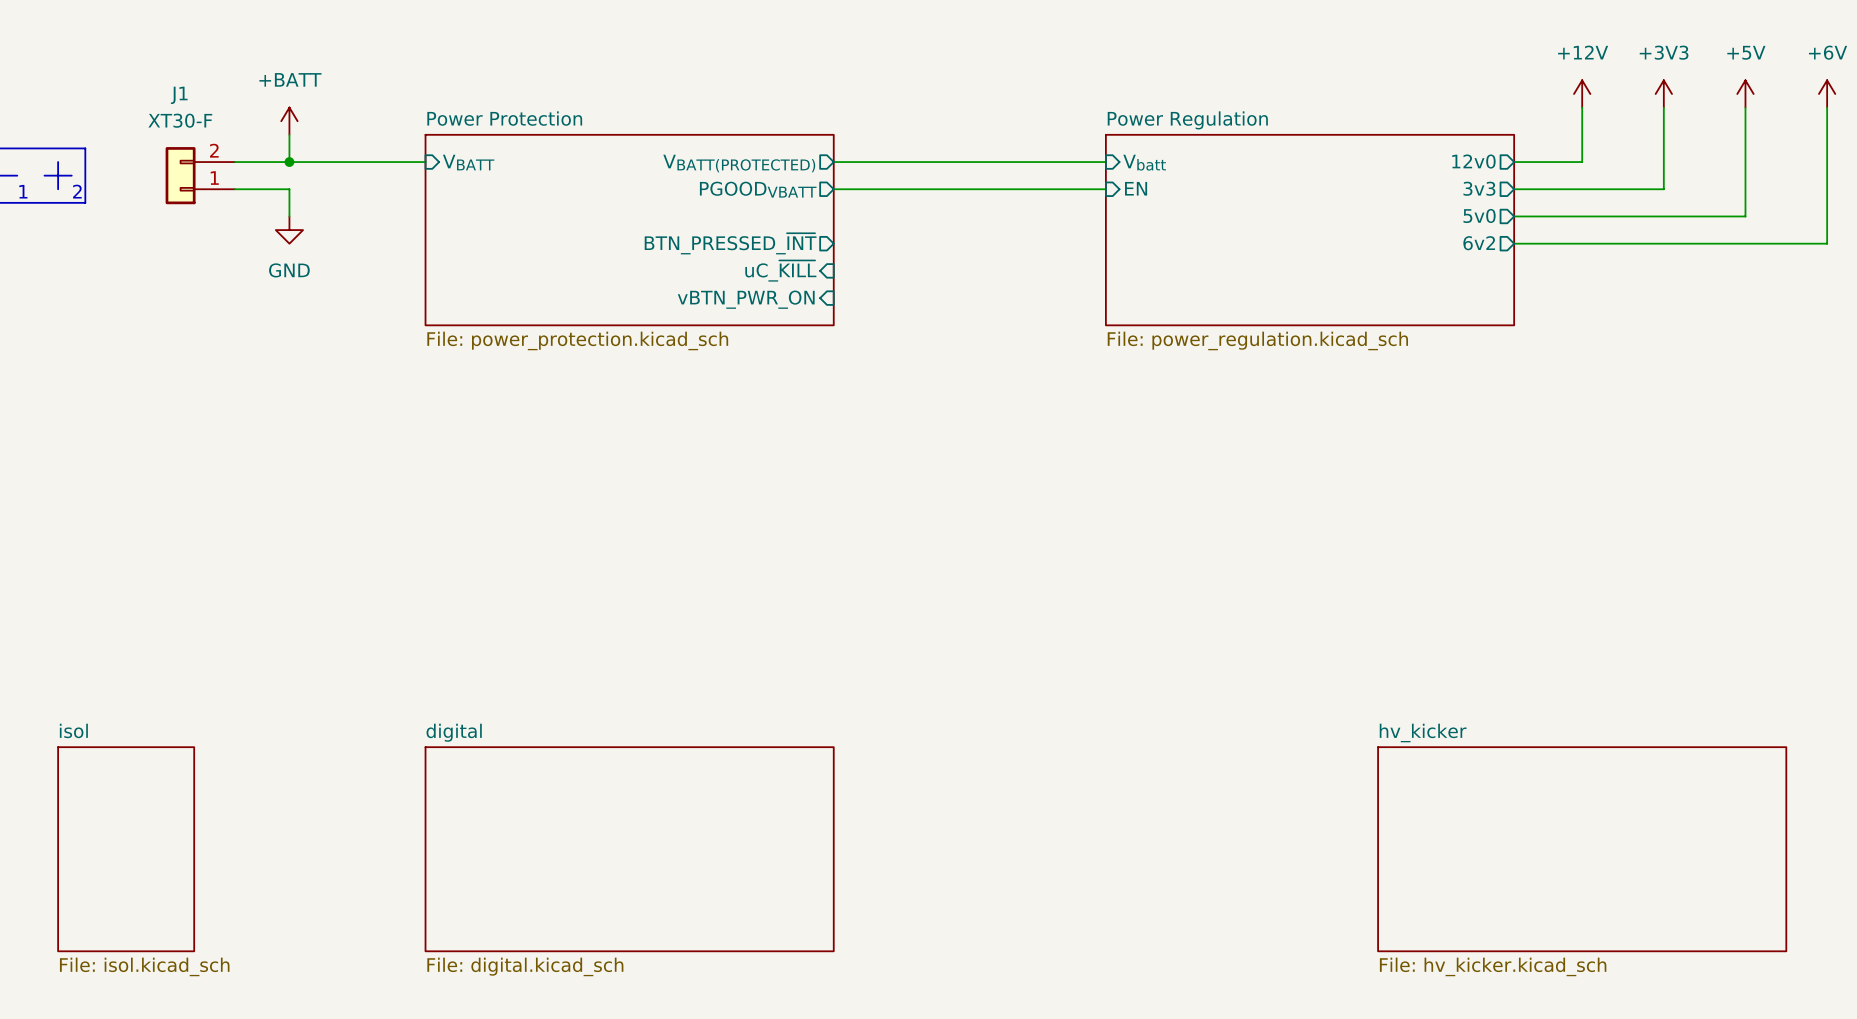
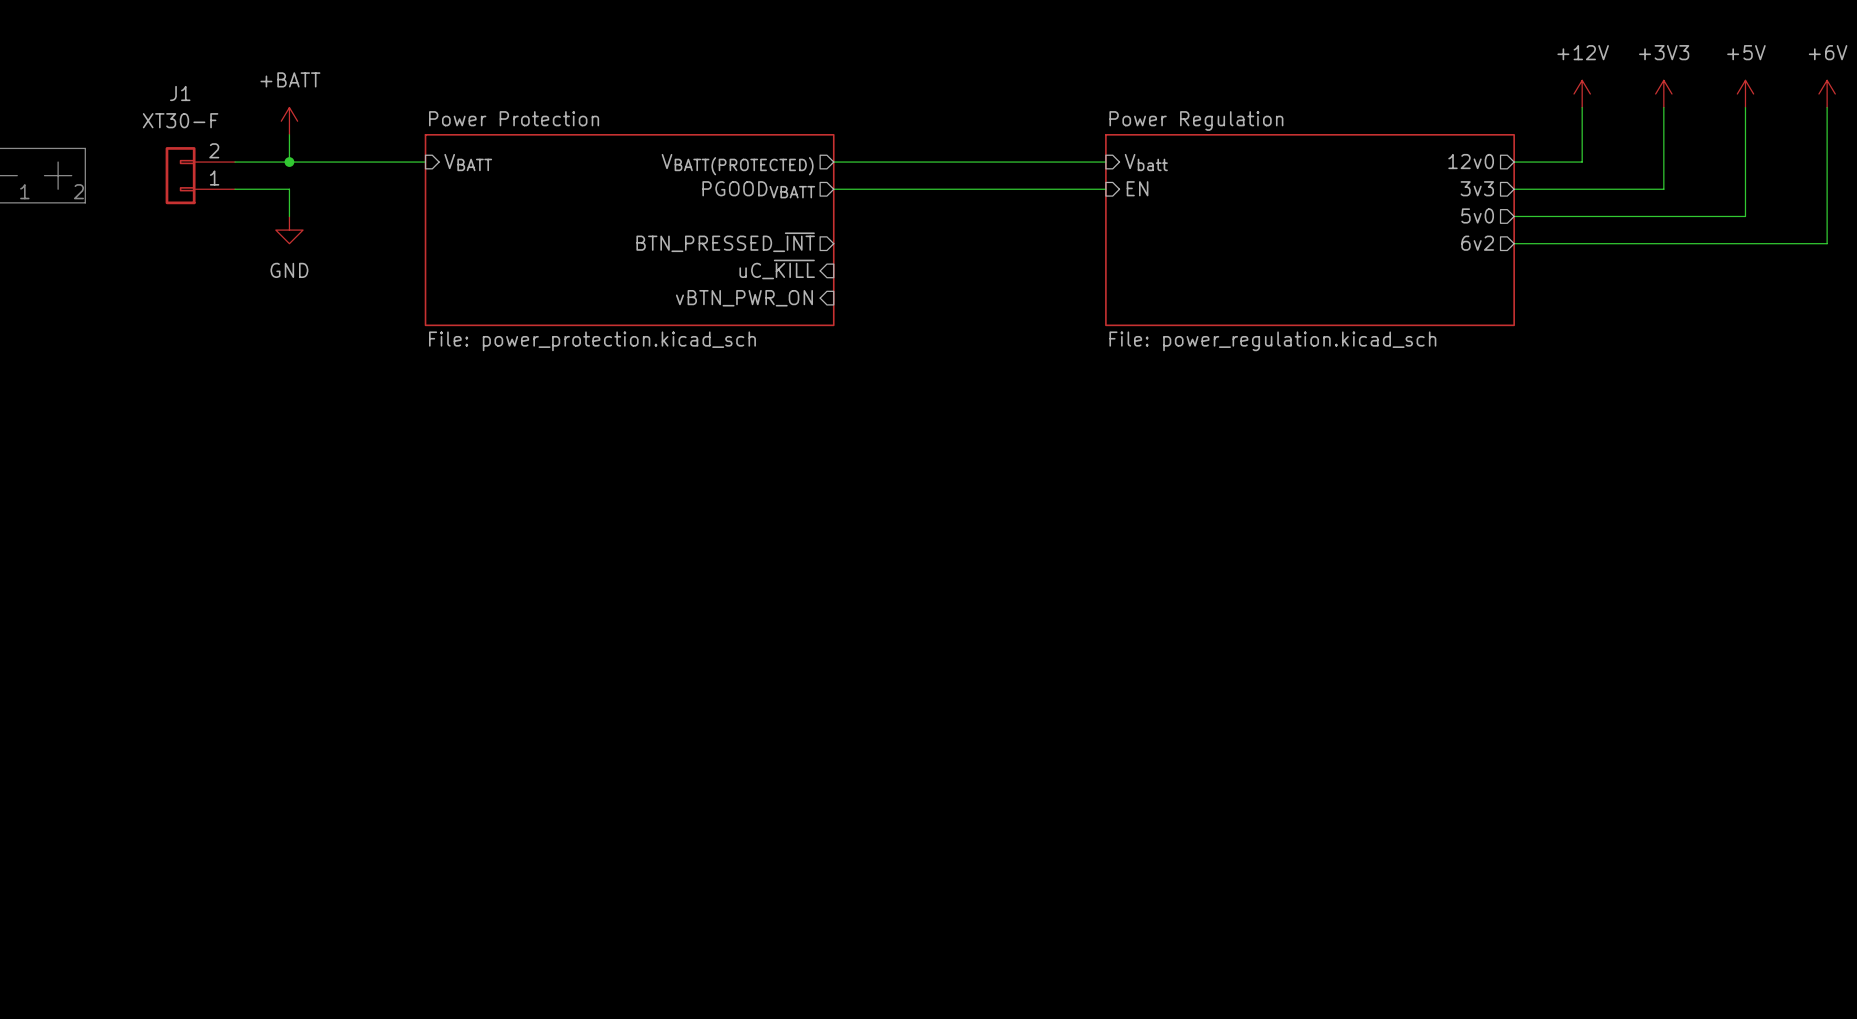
sheet isol: File: isol.kicad_sch (126, 849) -> none
sheet digital: File: digital.kicad_sch (629, 849) -> none
sheet hv_kicker: File: hv_kicker.kicad_sch (1582, 849) -> none

